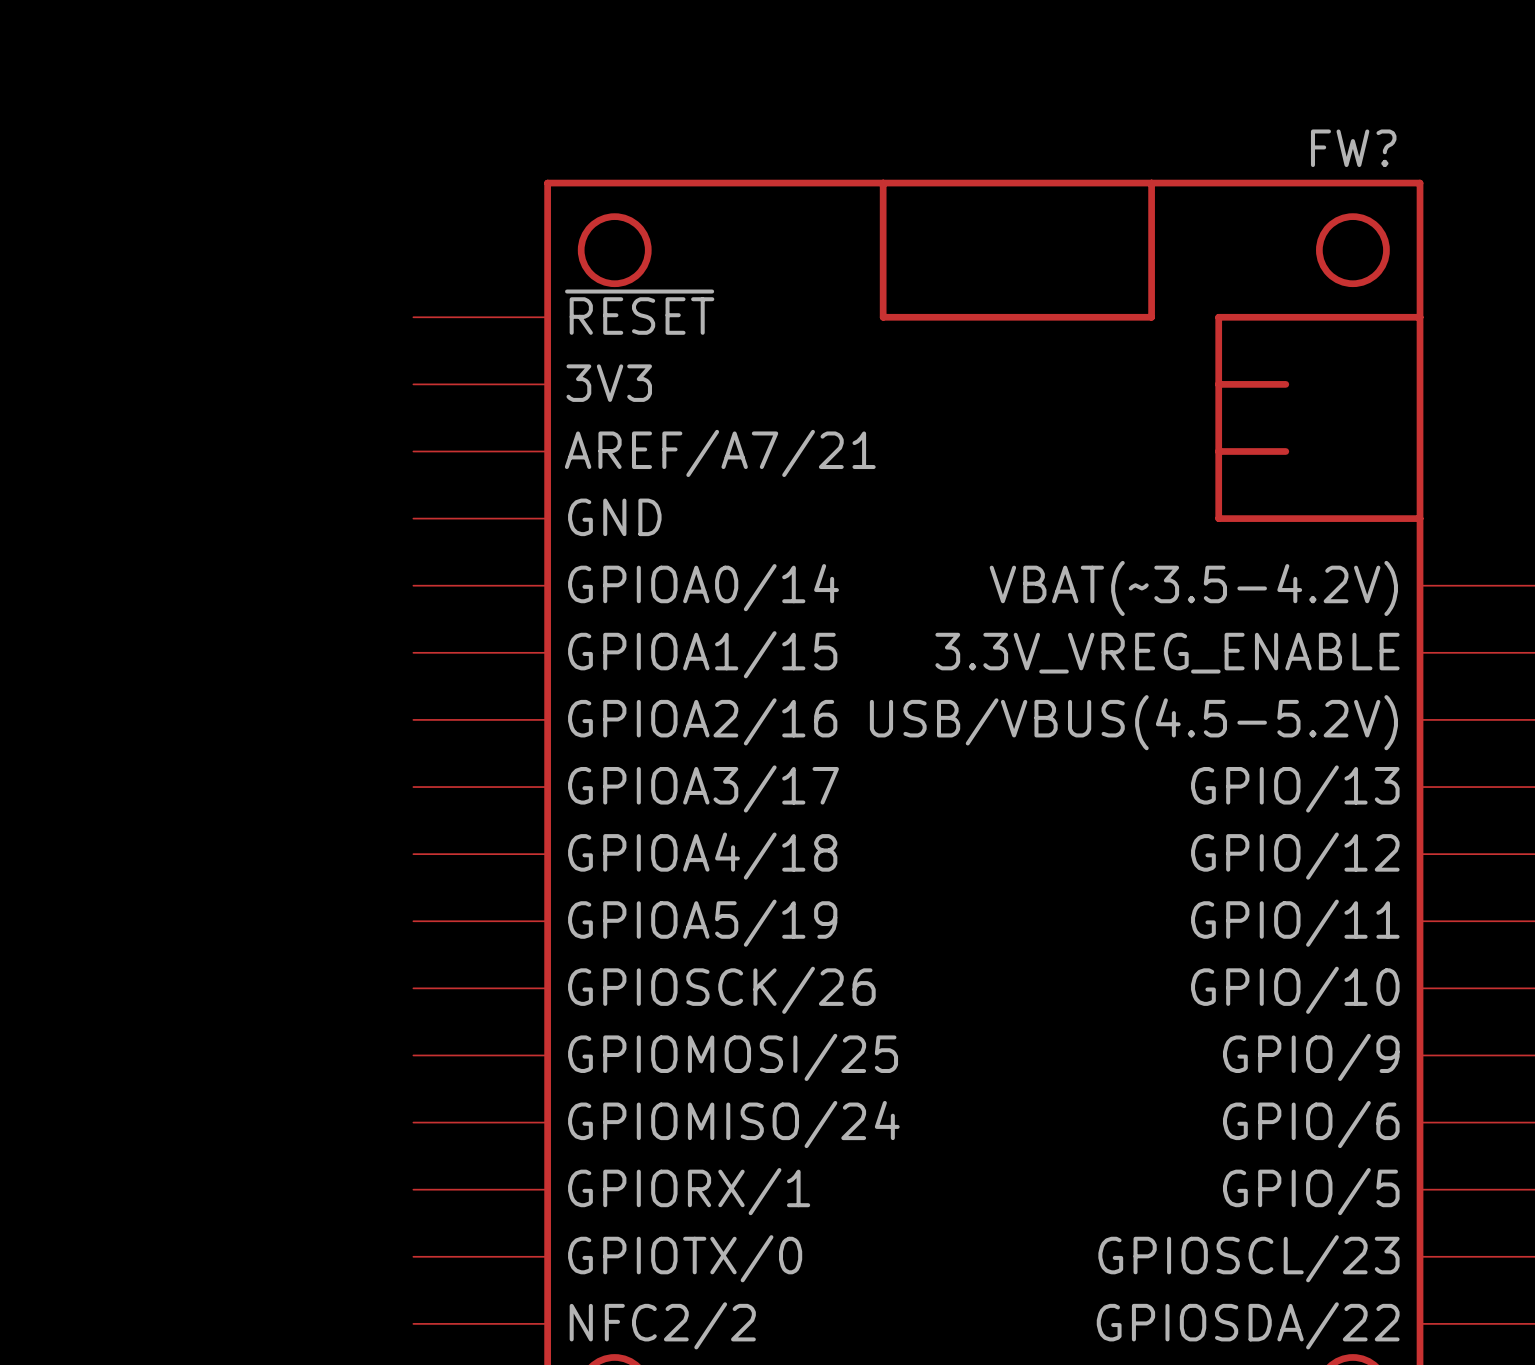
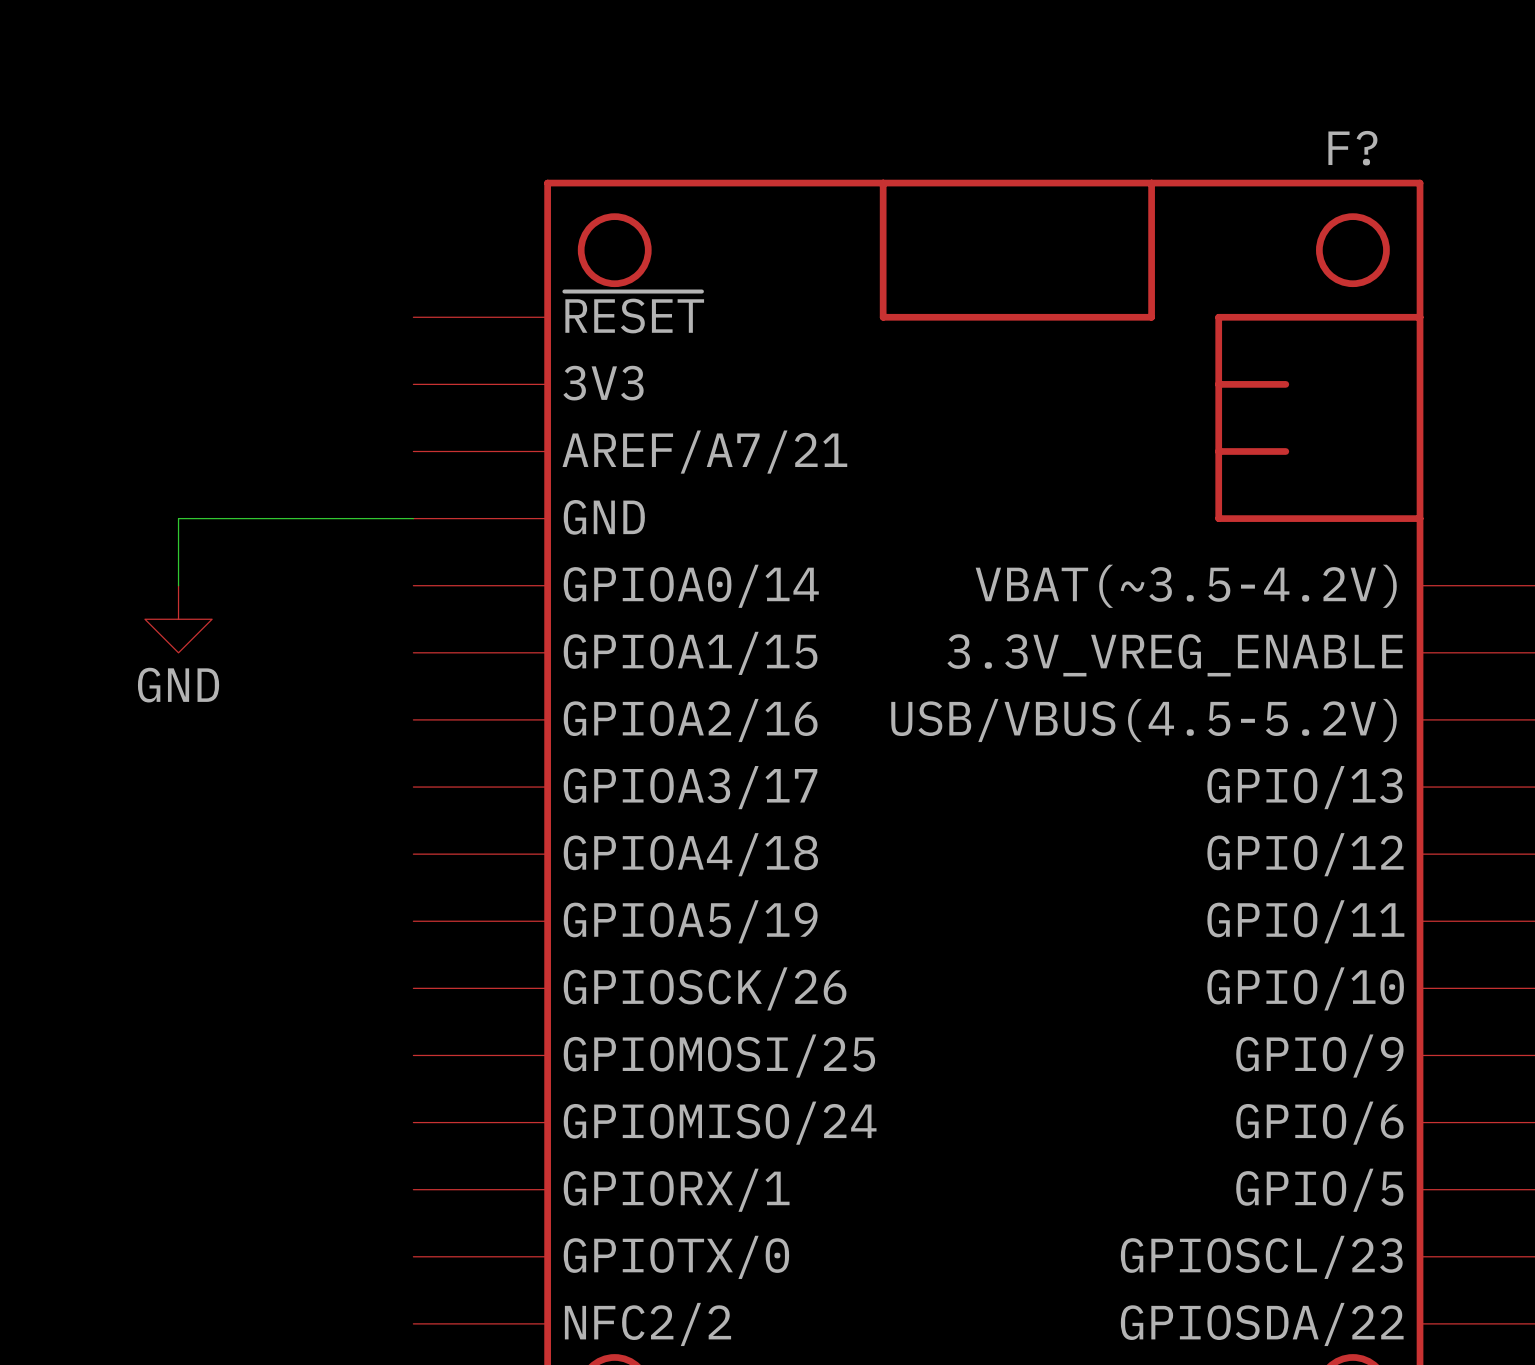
FW? name: FW? (1353, 148) -> F? (1352, 148)
wire: none -> (413, 518) (178, 518) (178, 585)
power symbol: none -> GND (178, 619)

